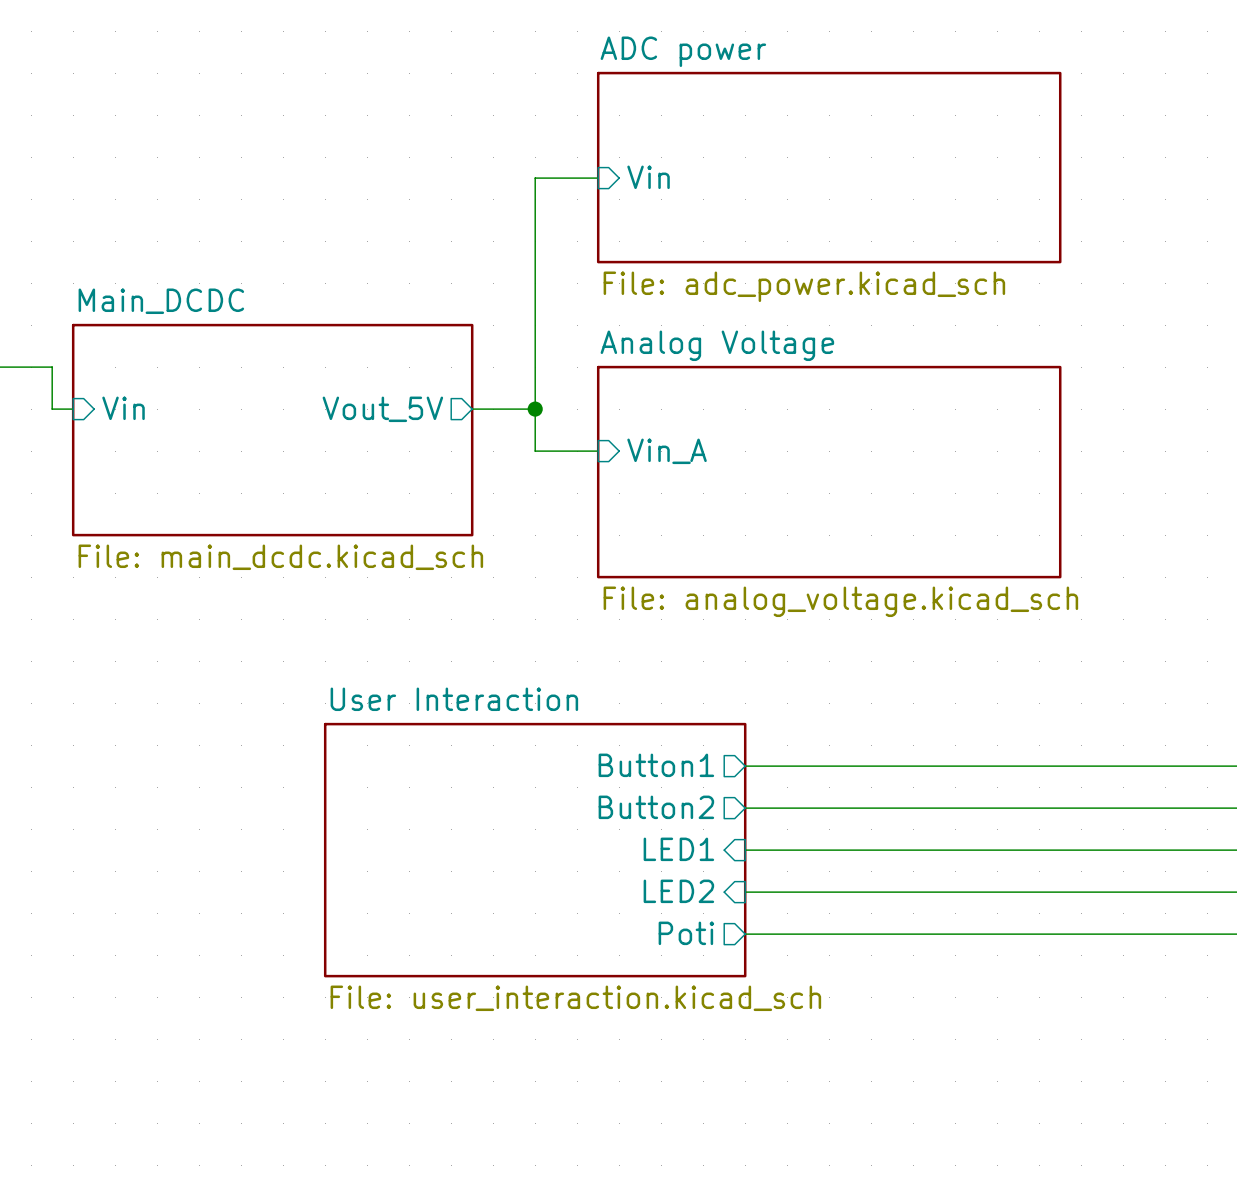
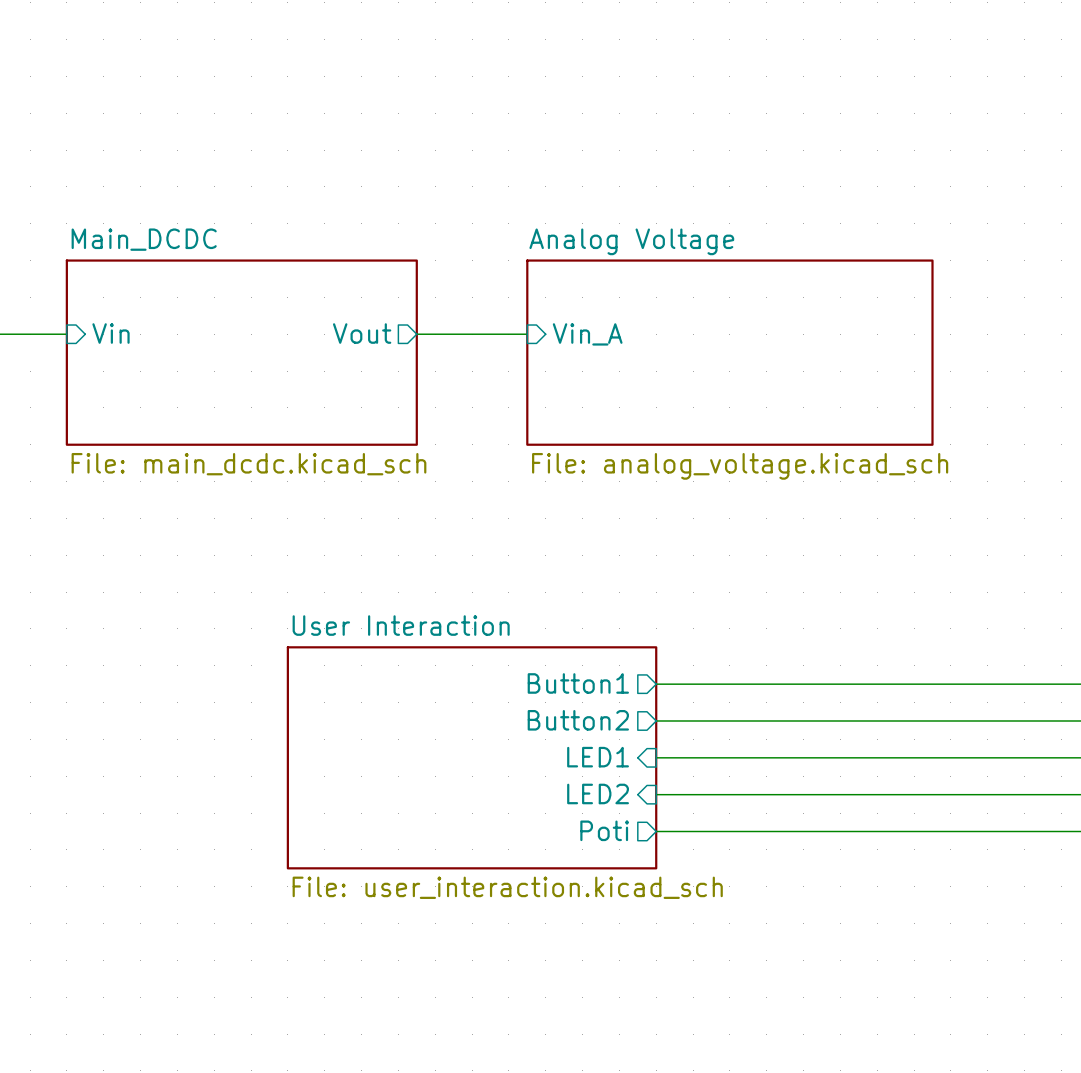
sheet ADC power: File: adc_power.kicad_sch (829, 167) -> none
sheet pin: Vin (648, 177) -> none
wire: (598, 178) (535, 178) (535, 451) (598, 451) -> none
wire: (52, 367) (52, 409) (73, 409) -> (48, 334) (66, 334)
wire: none -> (416, 334) (527, 334)
sheet pin position: Vin (123, 408) -> Vin (110, 333)
sheet pin: Vout_5V (382, 409) -> Vout (362, 333)
wire: (472, 409) (535, 409) -> none
junction: (535, 409) -> none
sheet Main_DCDC position: (272, 430) -> (241, 352)
sheet pin position: Vin_A (667, 451) -> Vin_A (587, 334)
sheet Analog Voltage position: (829, 472) -> (729, 352)

